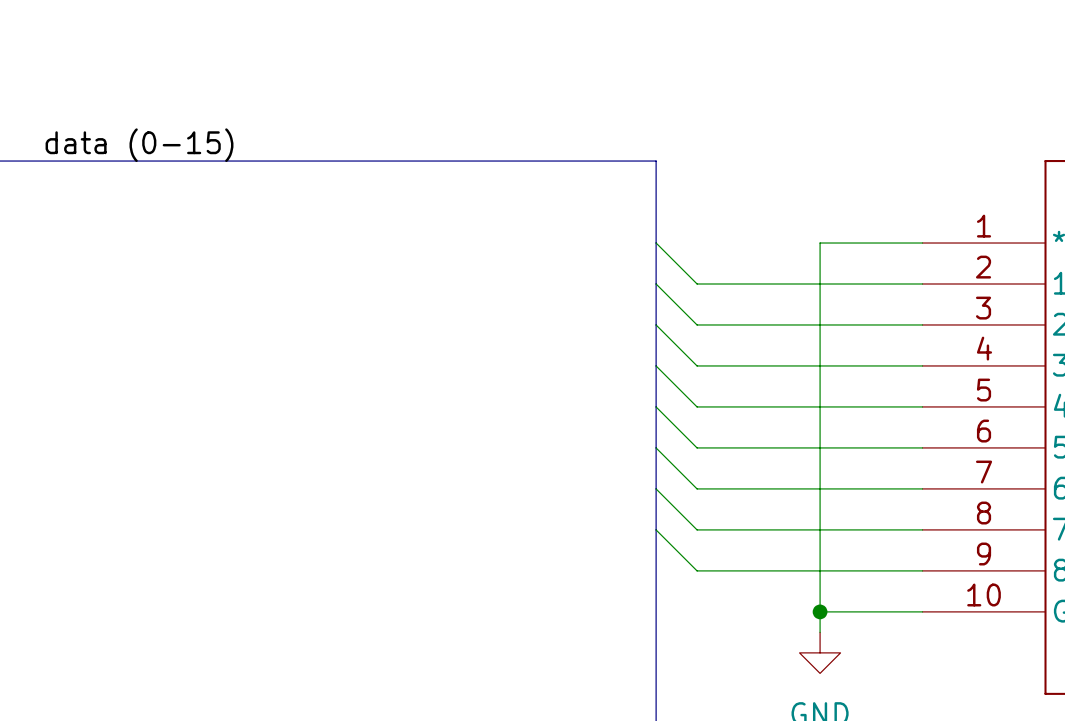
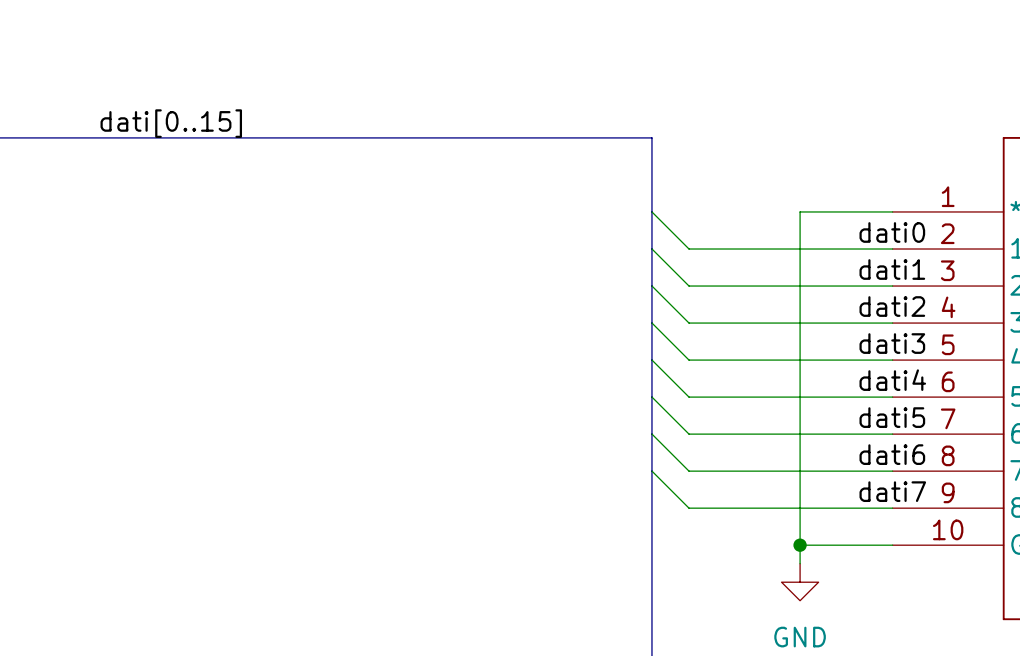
label: data (0-15) (139, 145) -> dati[0..15] (171, 123)
label: none -> dati0 (892, 232)
label: none -> dati1 (892, 269)
label: none -> dati2 (892, 306)
label: none -> dati3 (892, 343)
label: none -> dati4 (892, 380)
label: none -> dati5 (892, 417)
label: none -> dati6 (892, 454)
label: none -> dati7 (892, 491)

